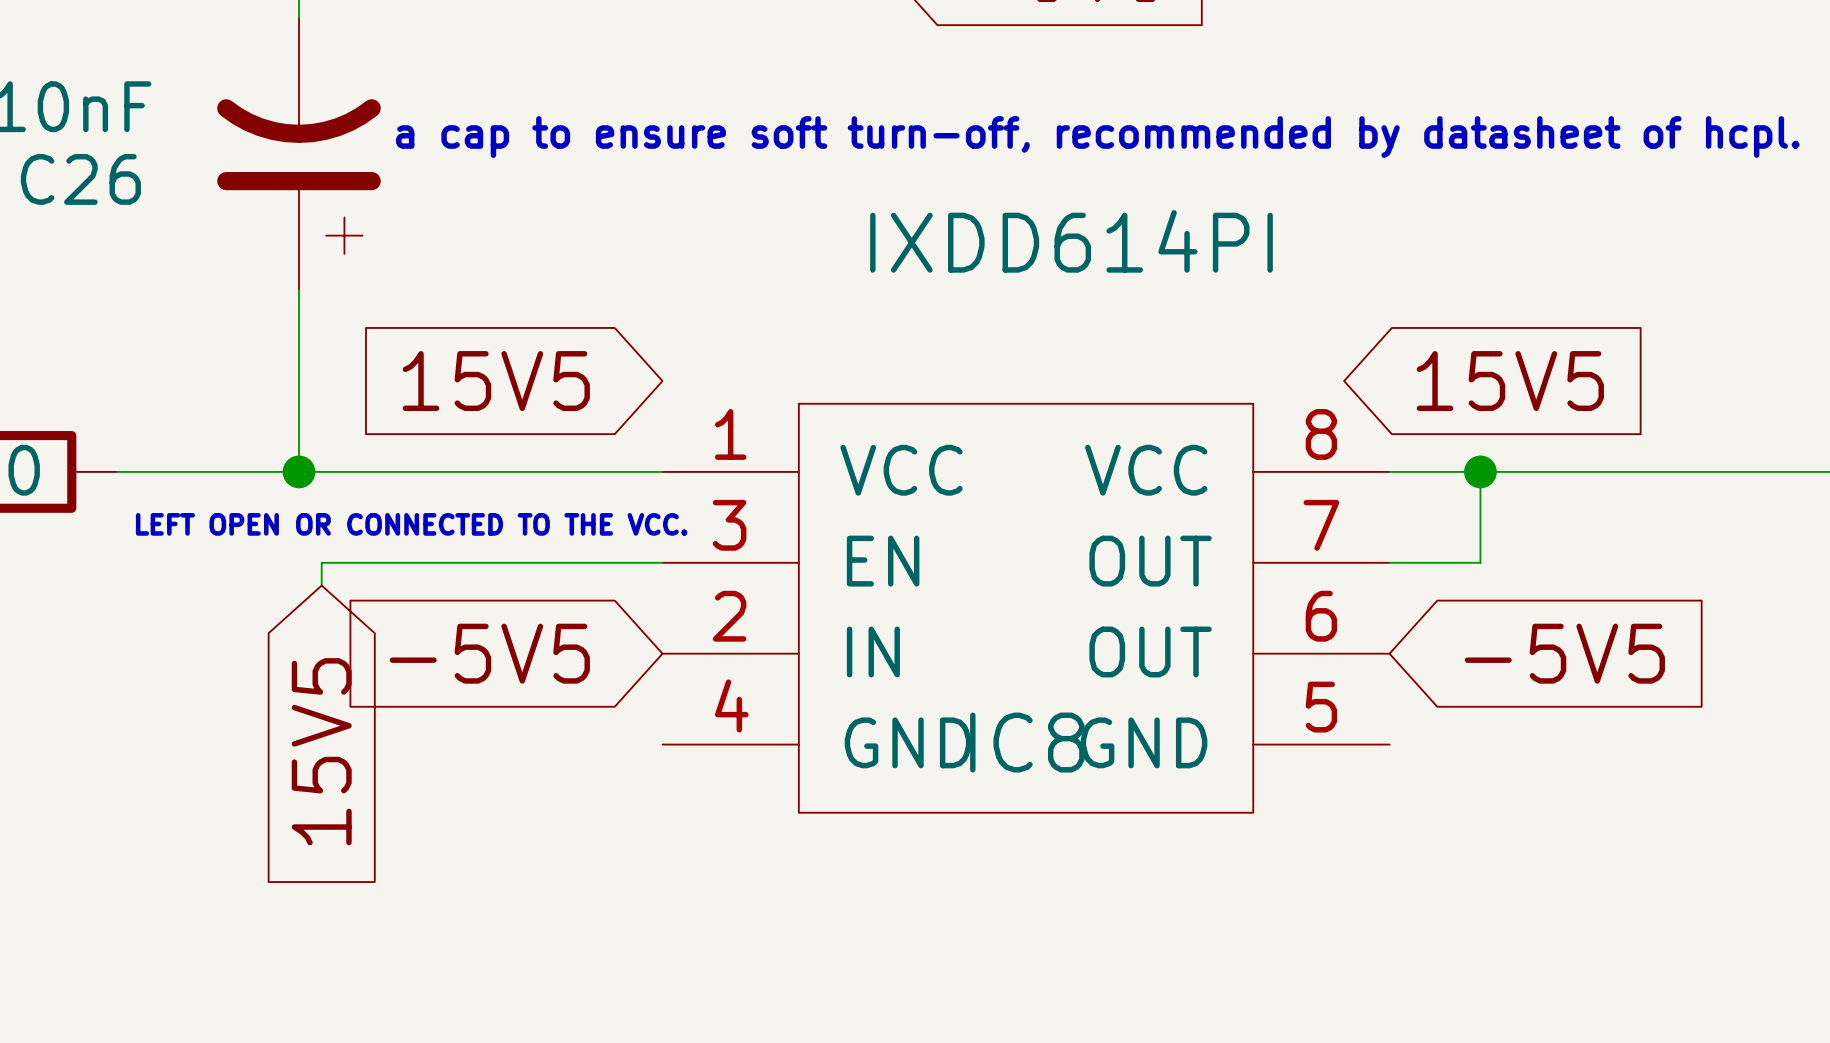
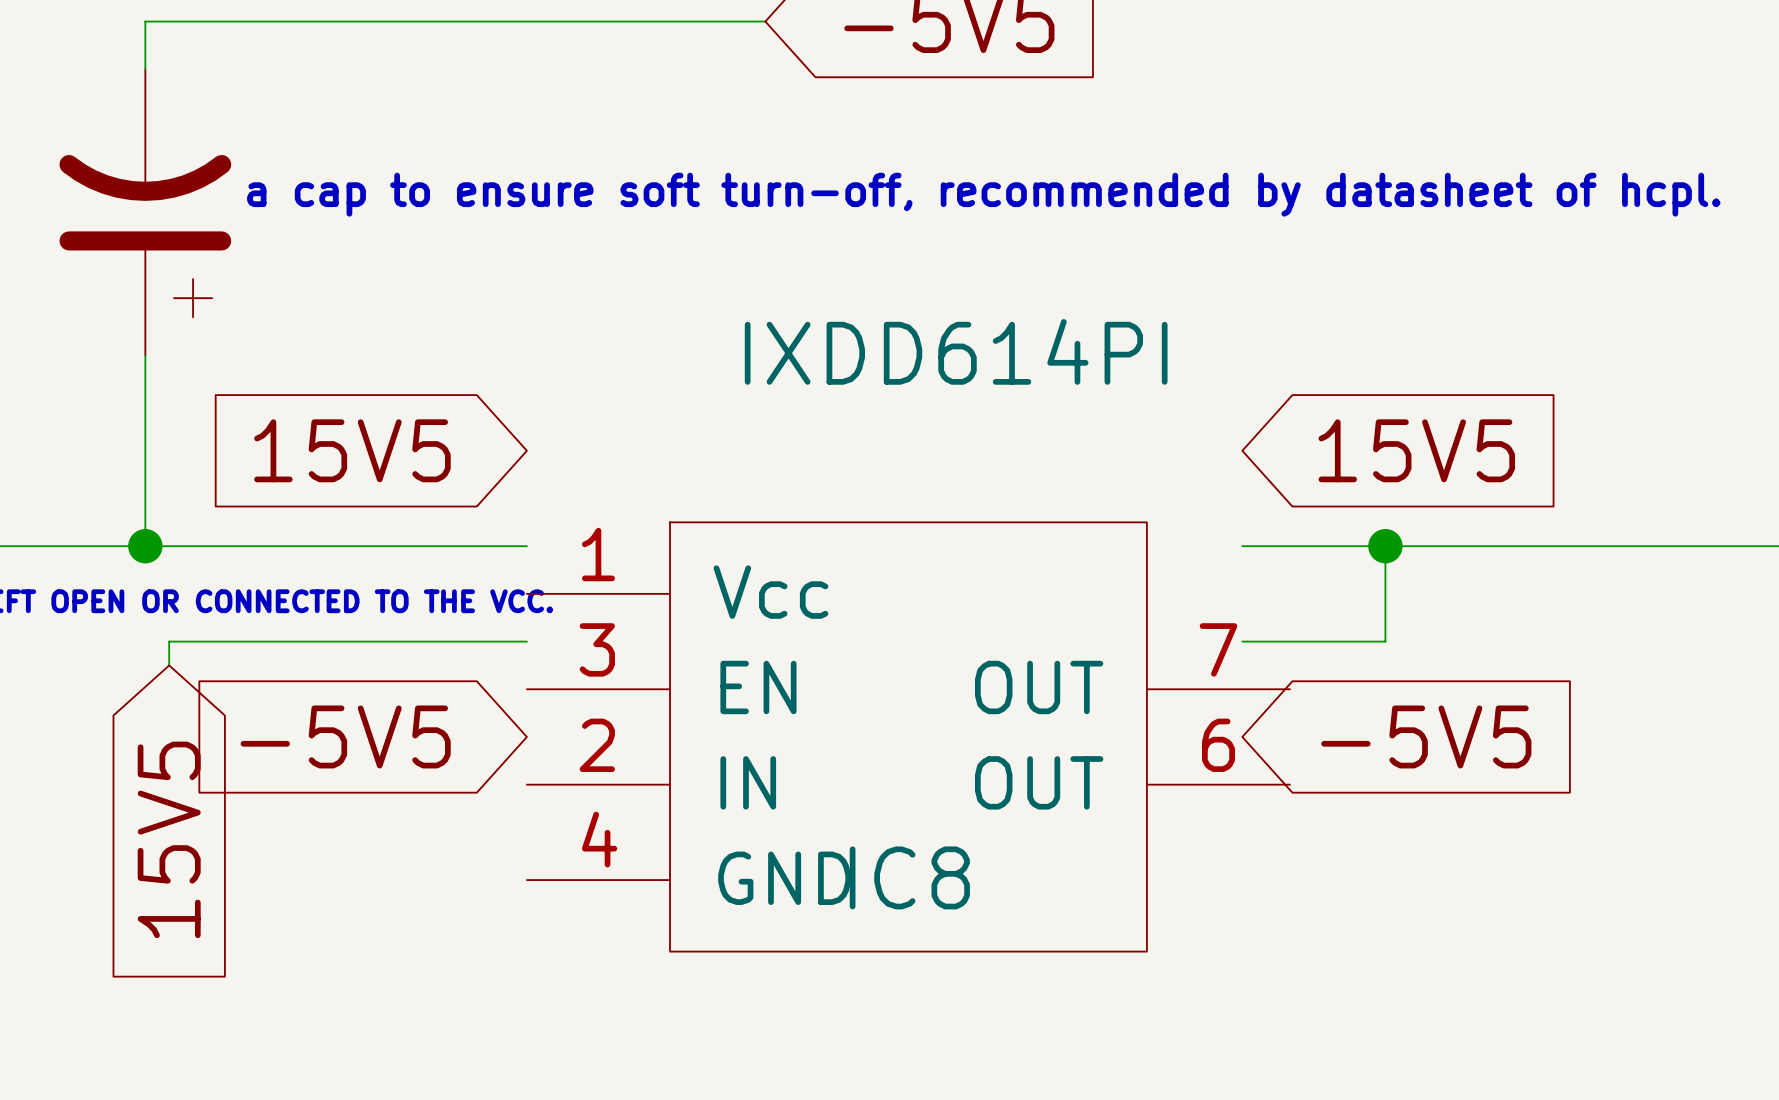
IC8 symbol: [662, 403, 1390, 813] -> [526, 522, 1291, 952]
global label position: -5V5 (1564, 653) -> -5V5 (1426, 736)

